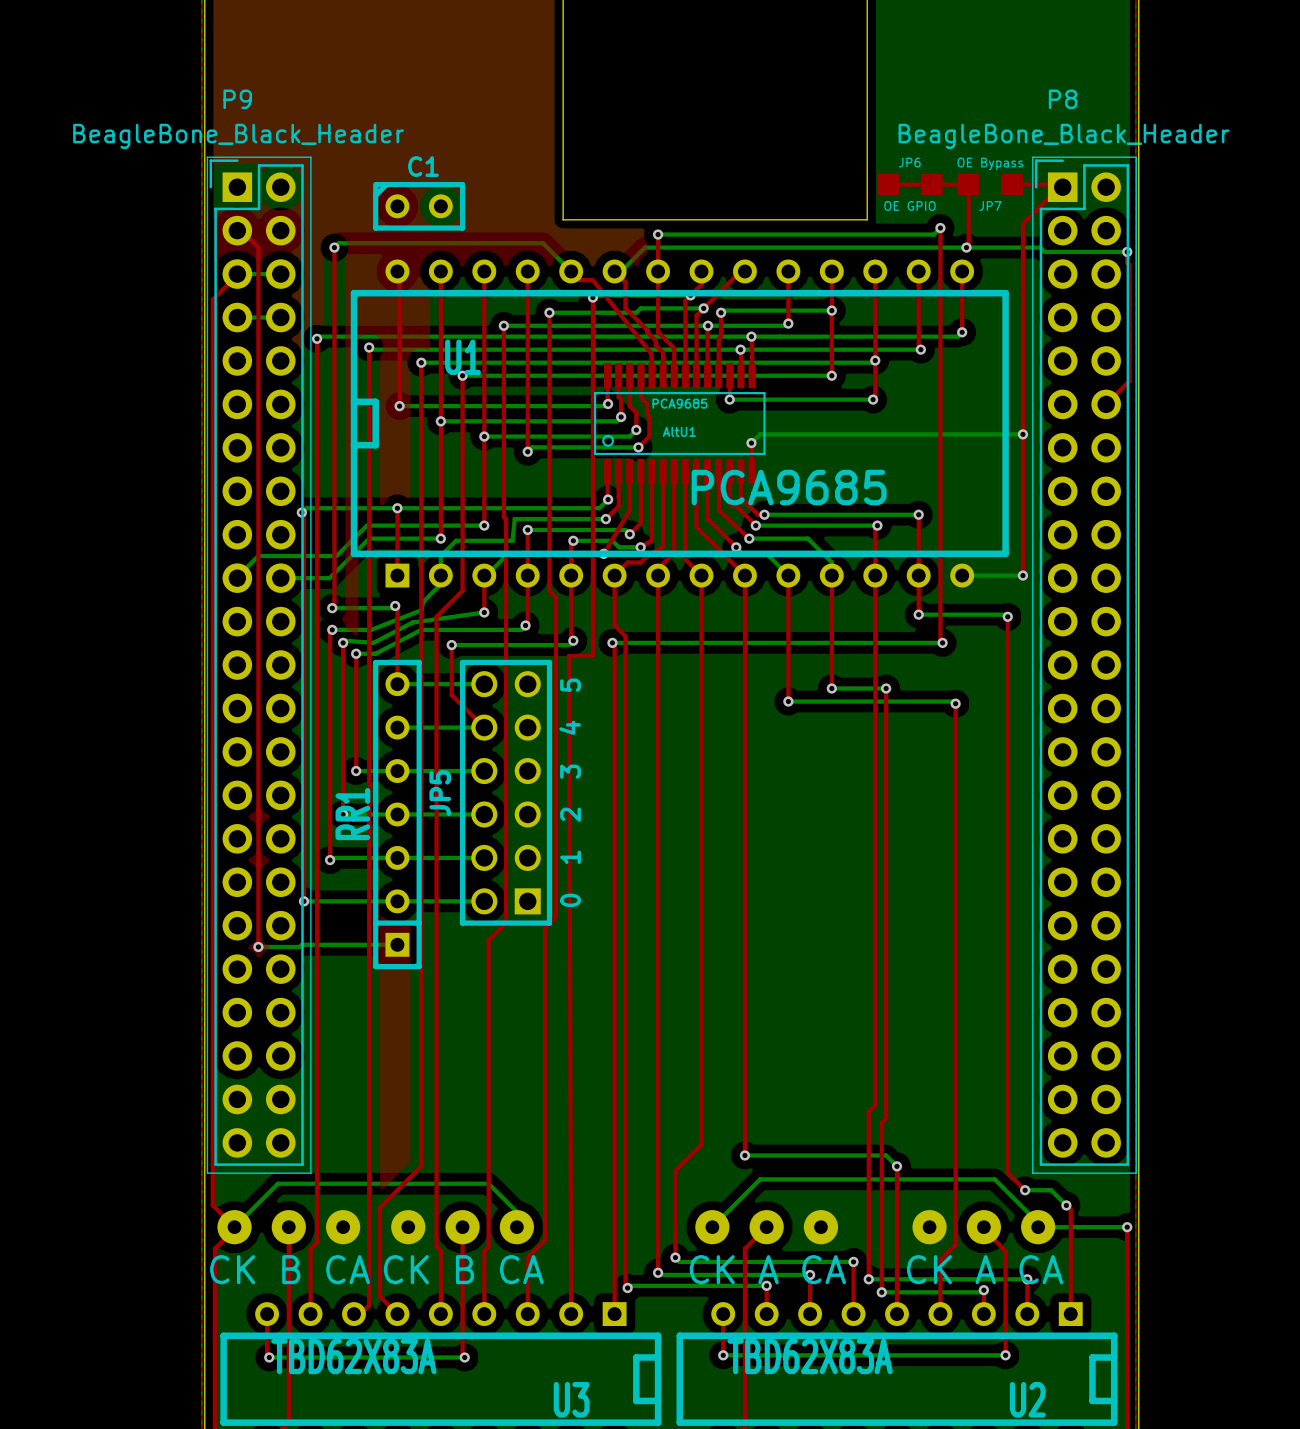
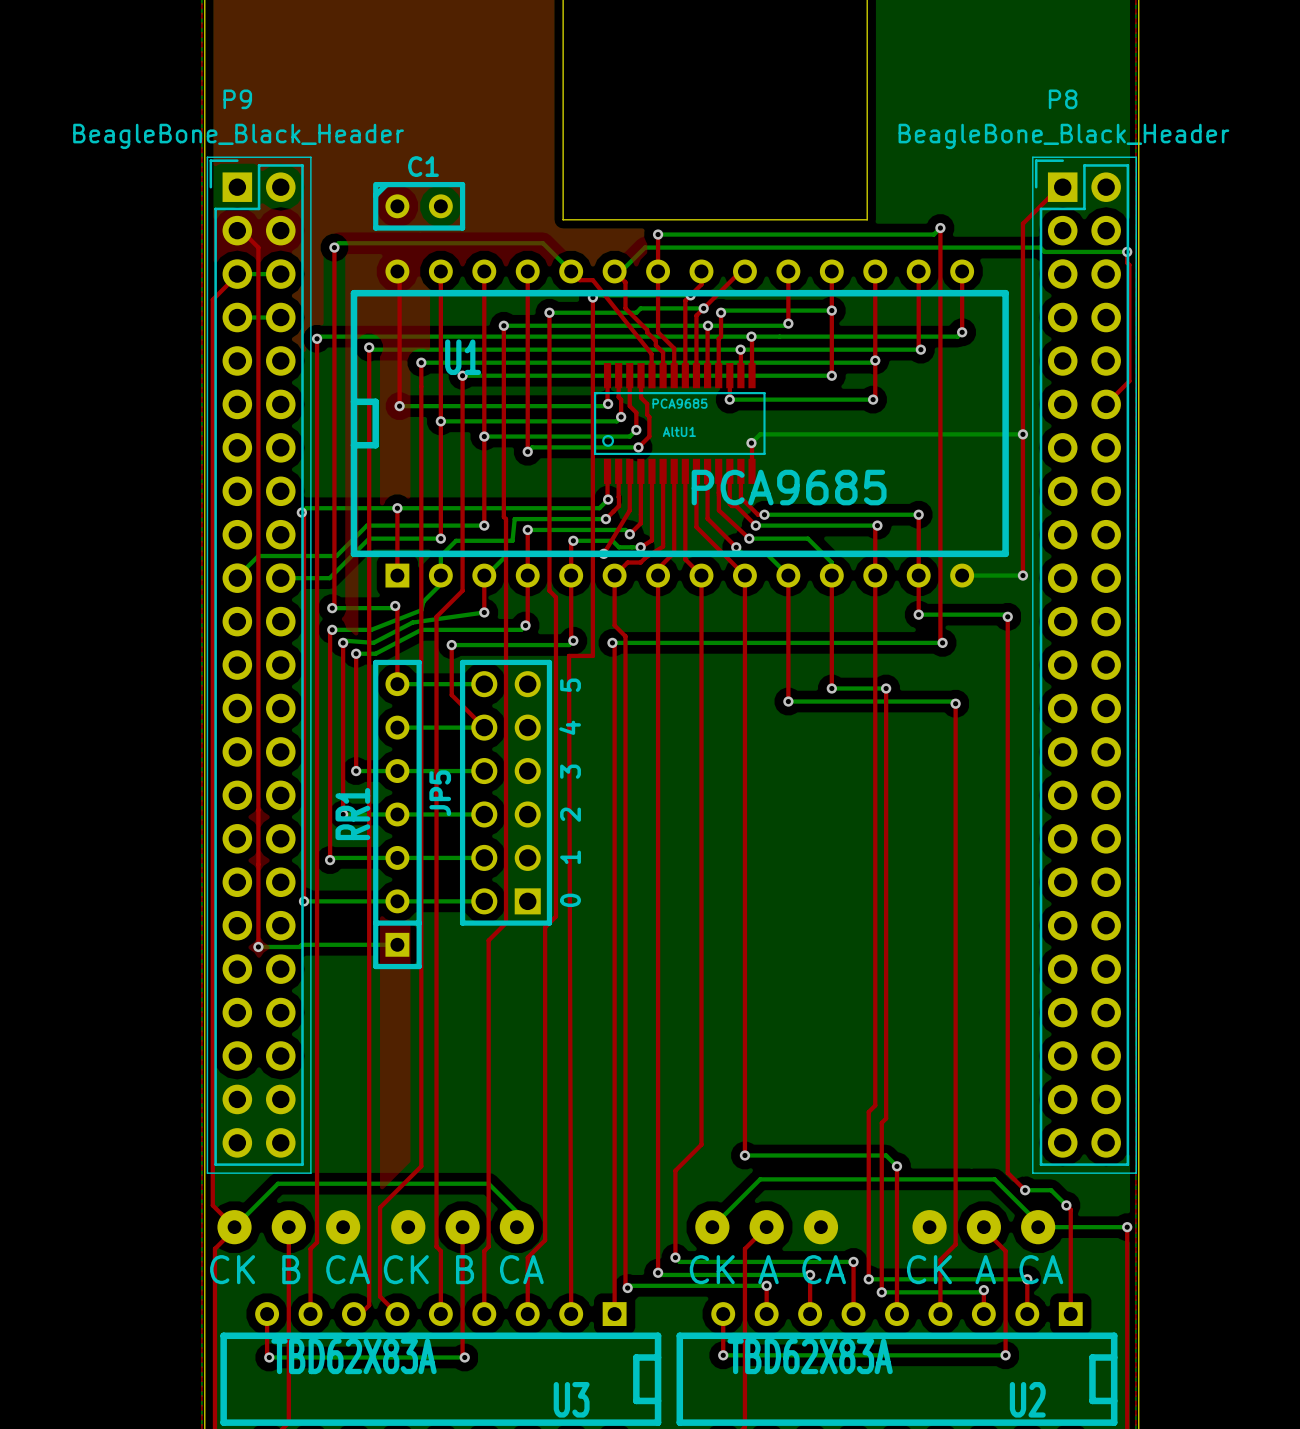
top track: (888, 184) (968, 184) (968, 245) (966, 247) -> none
JP6: OE GPIO (910, 184) -> none
JP7: OE Bypass (990, 184) -> none
top track: (1012, 184) (1060, 184) (1062, 187) -> none
via: (966, 247) -> none

